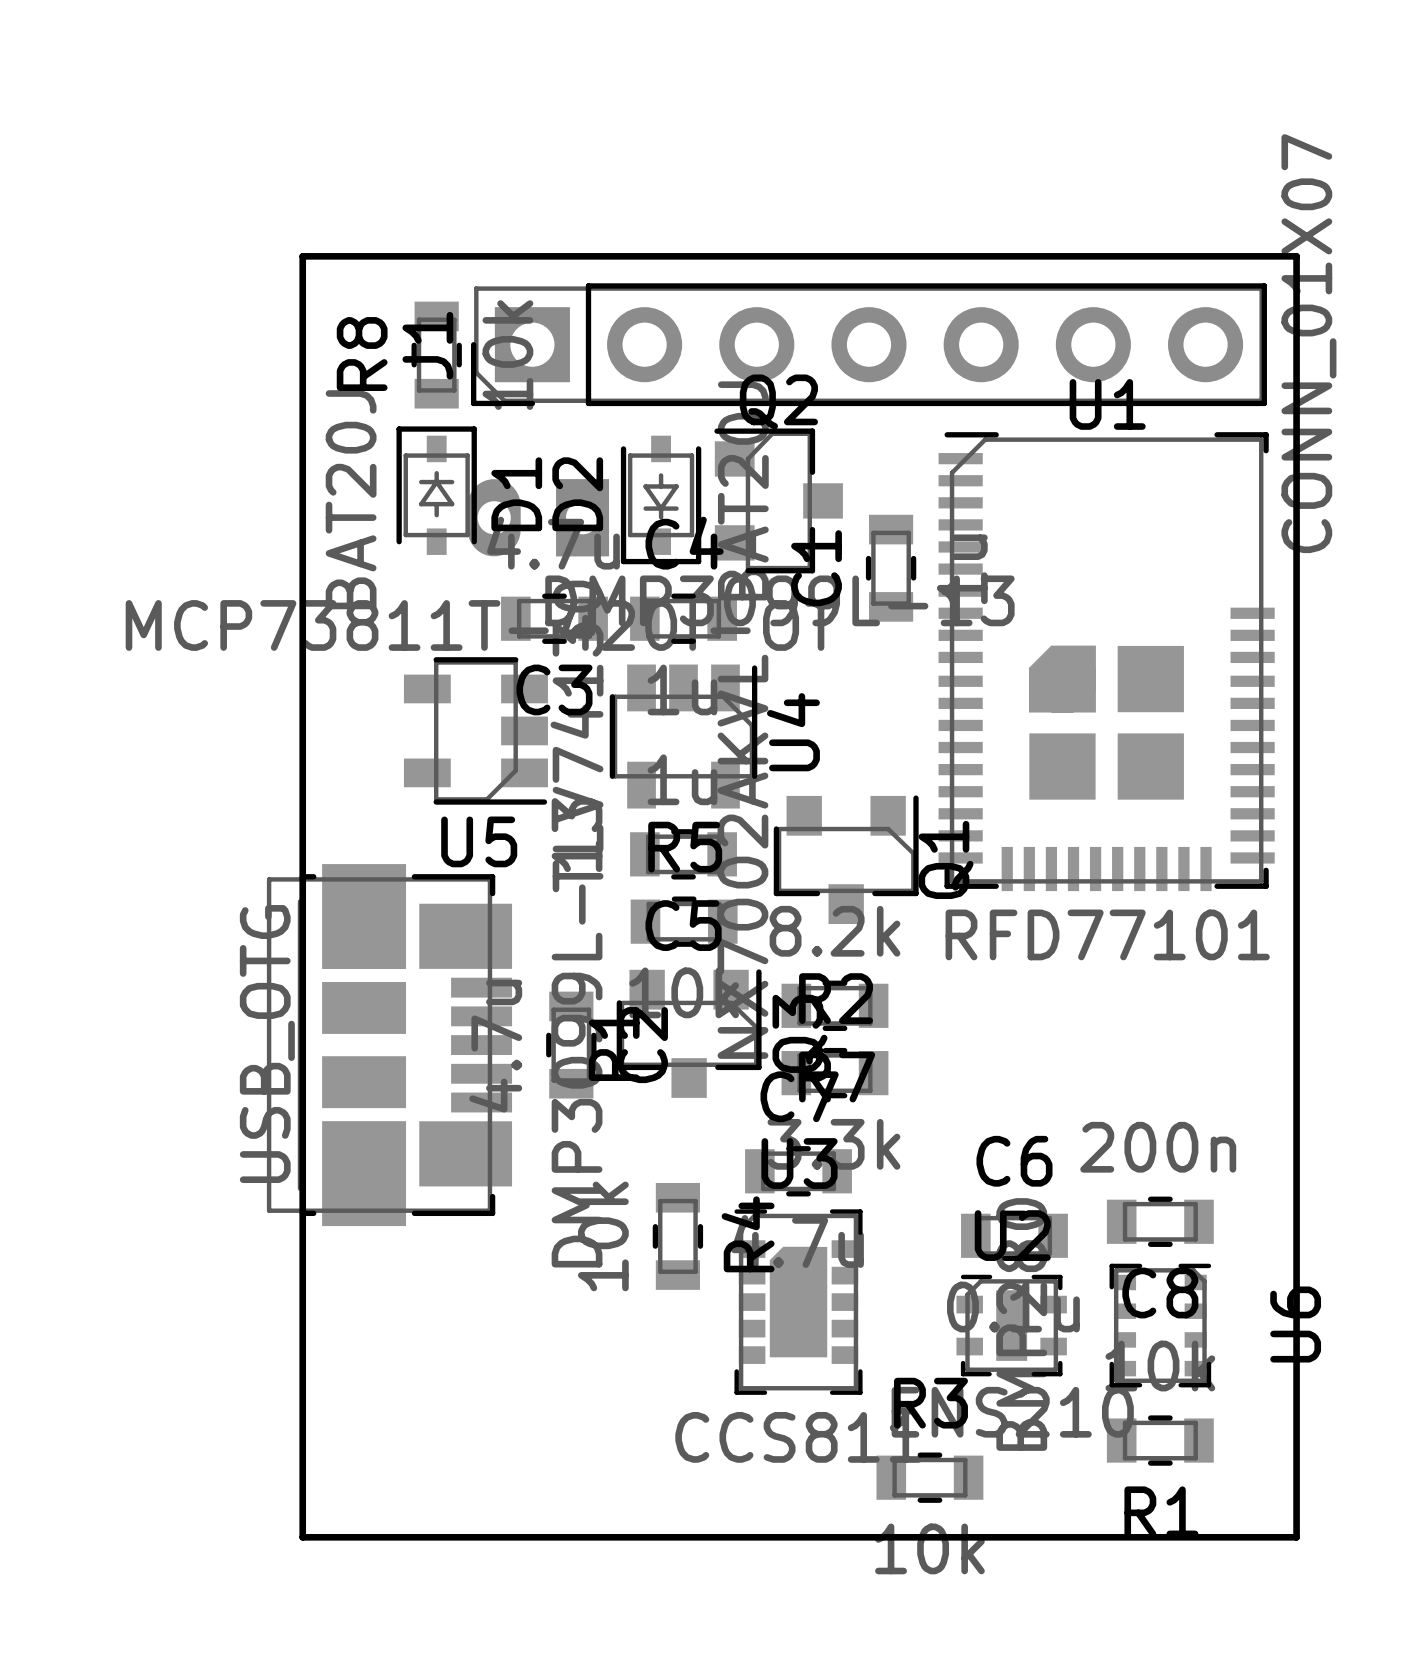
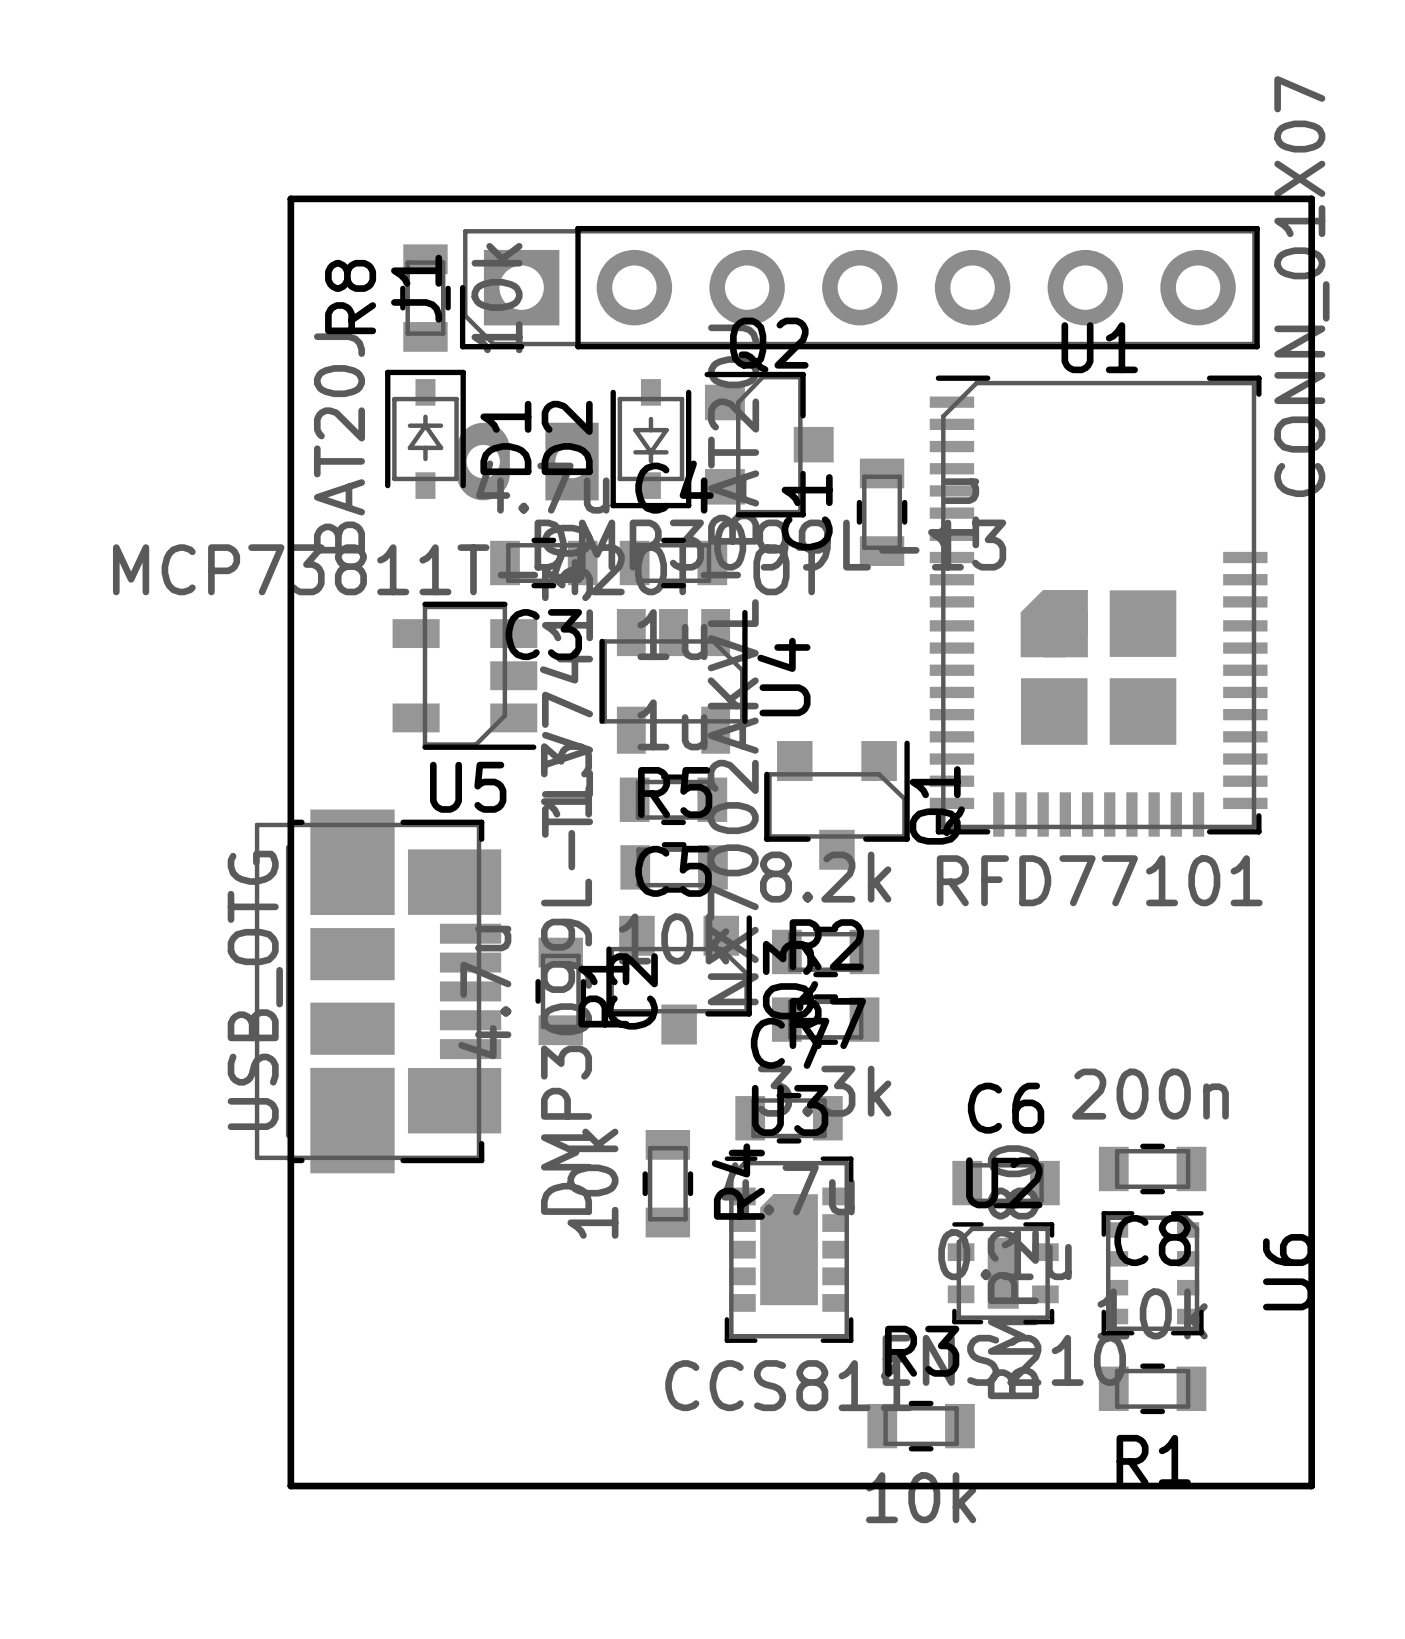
board edge: (1296, 256) (1296, 1537) -> (1289, 198) (1311, 198) (1311, 1486) (1289, 1486)

